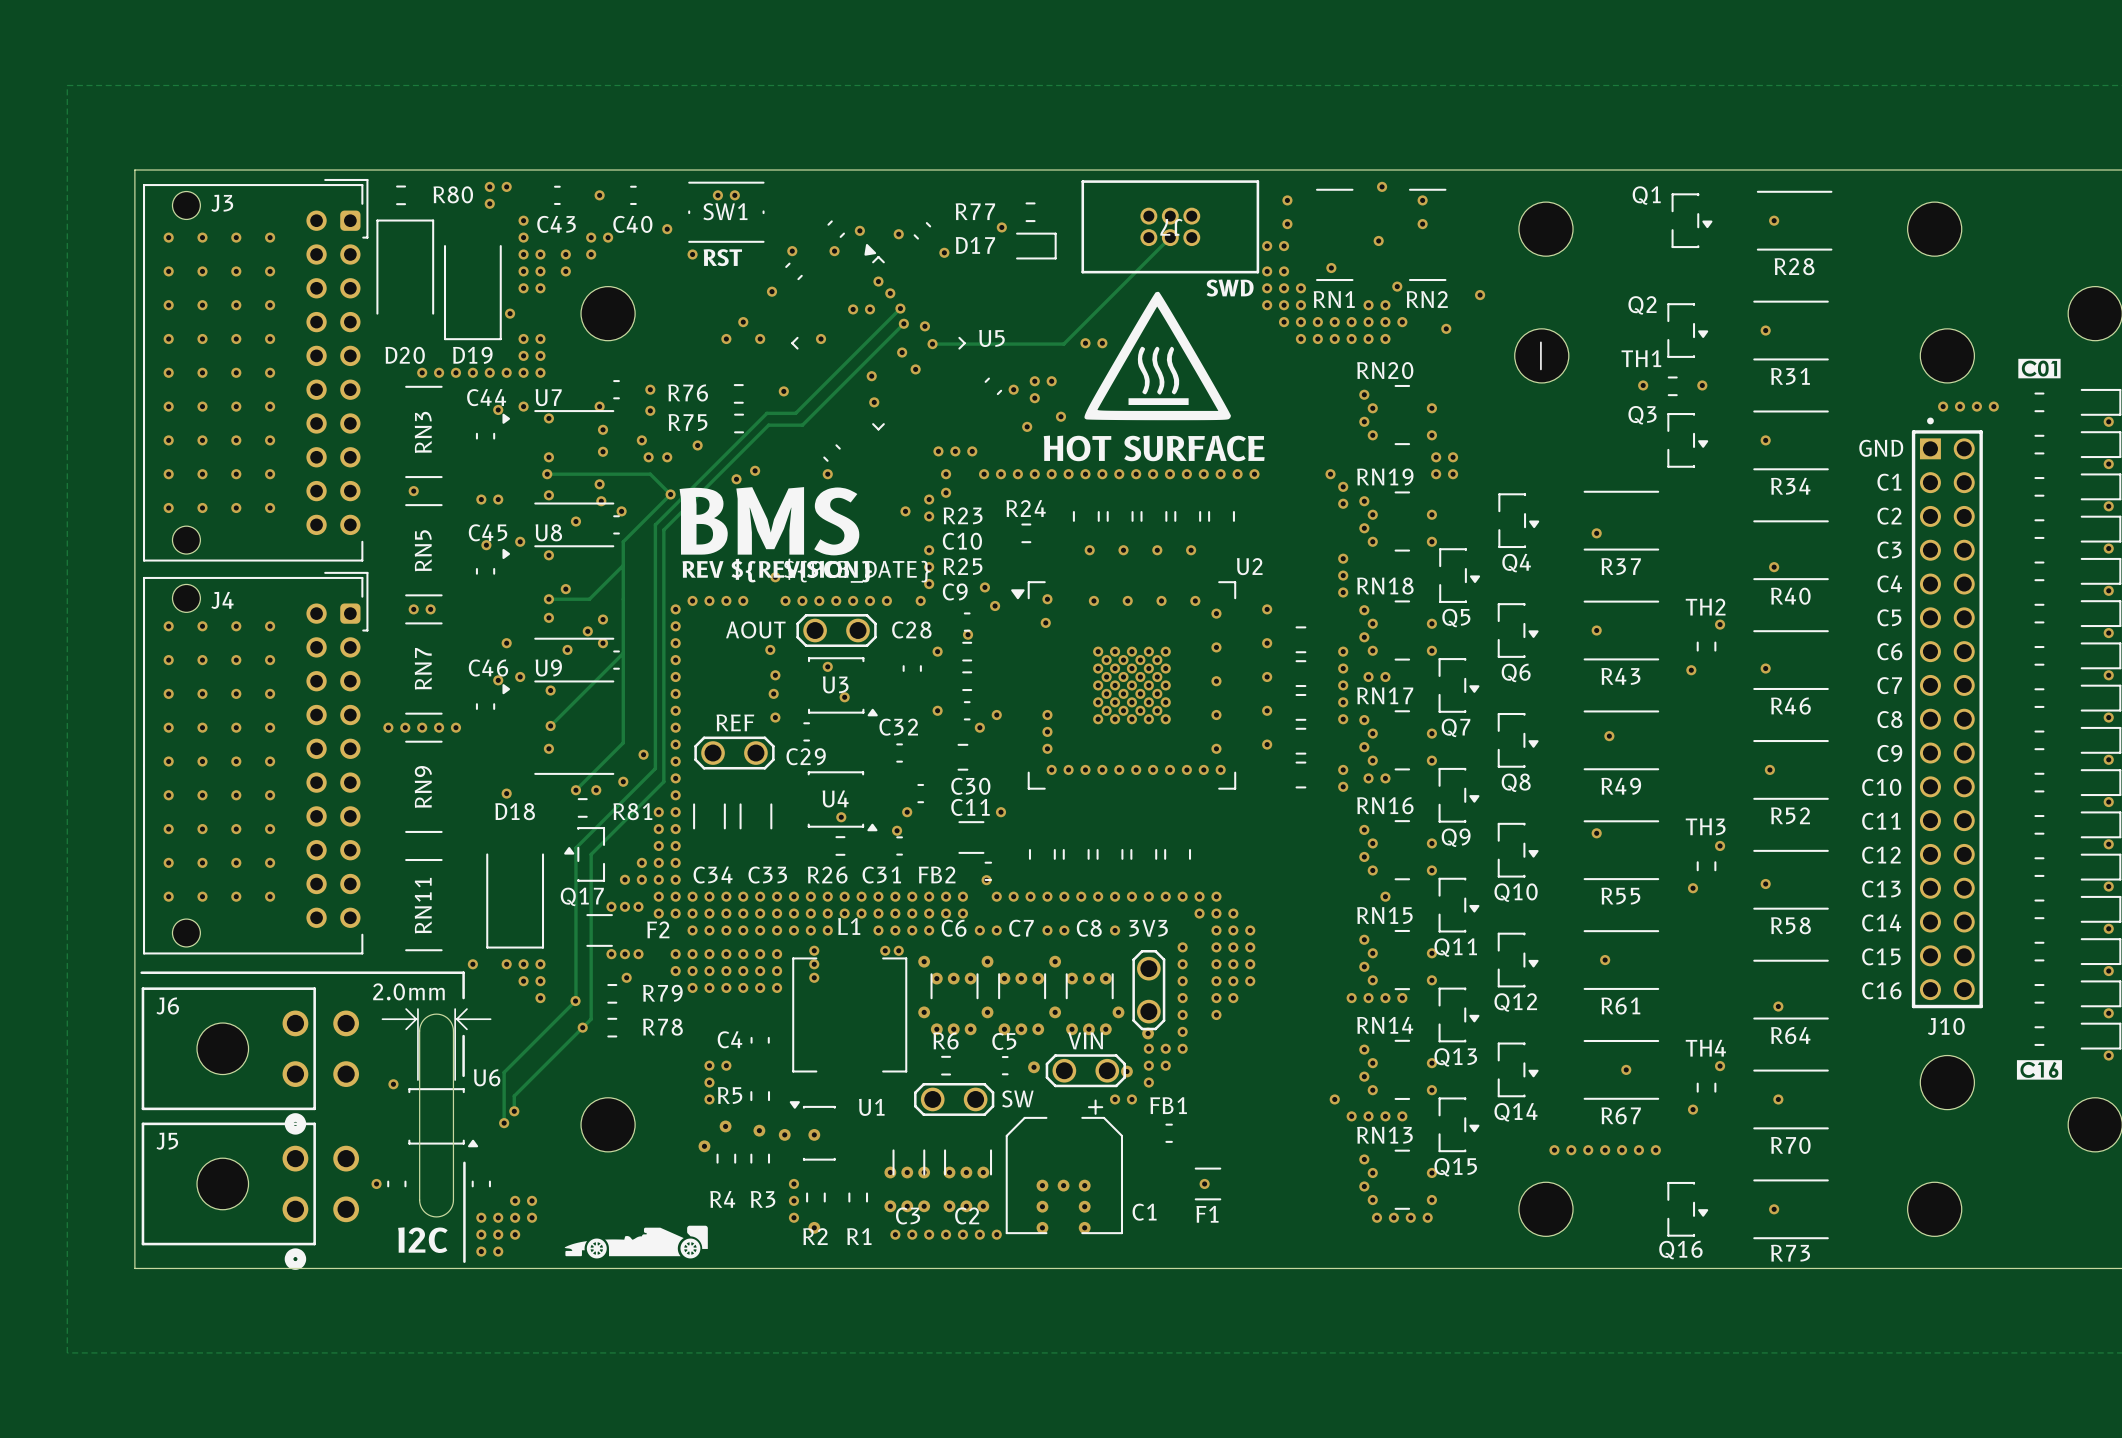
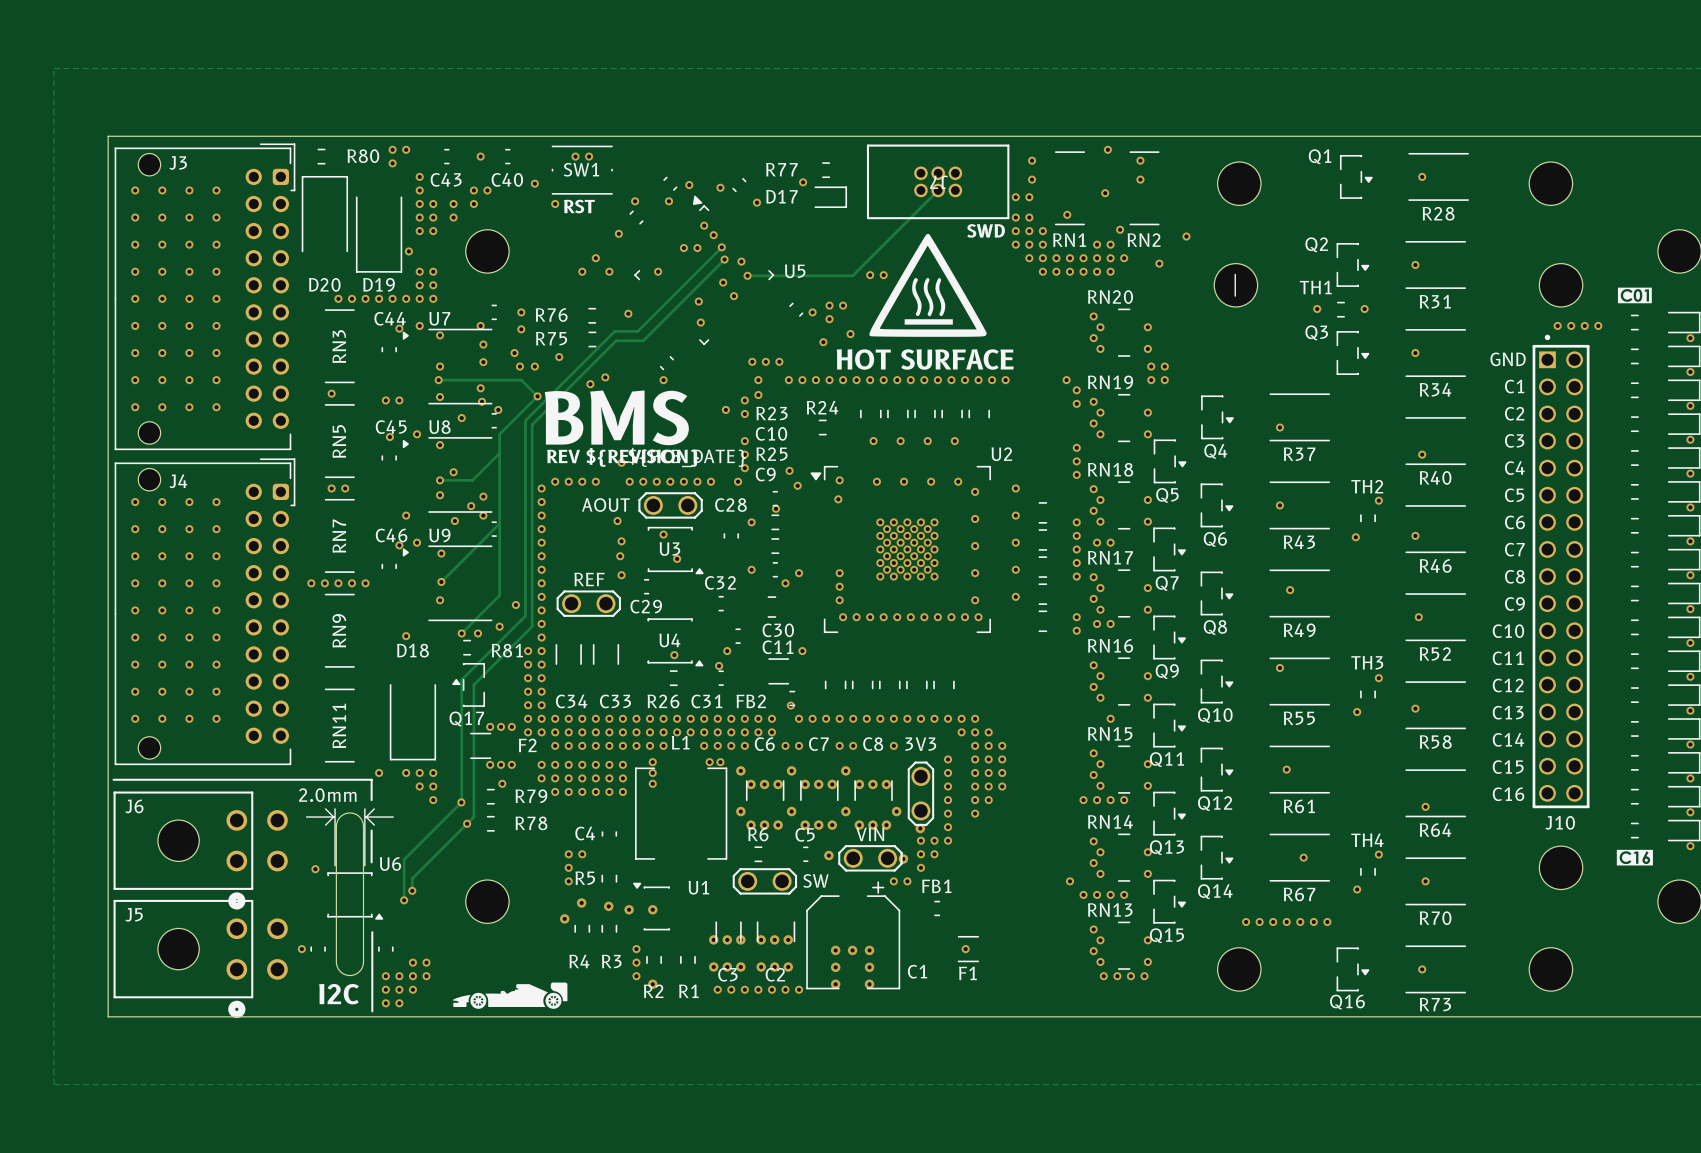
via: (641, 862) -> none
via: (624, 879) -> none
via: (641, 879) -> none

